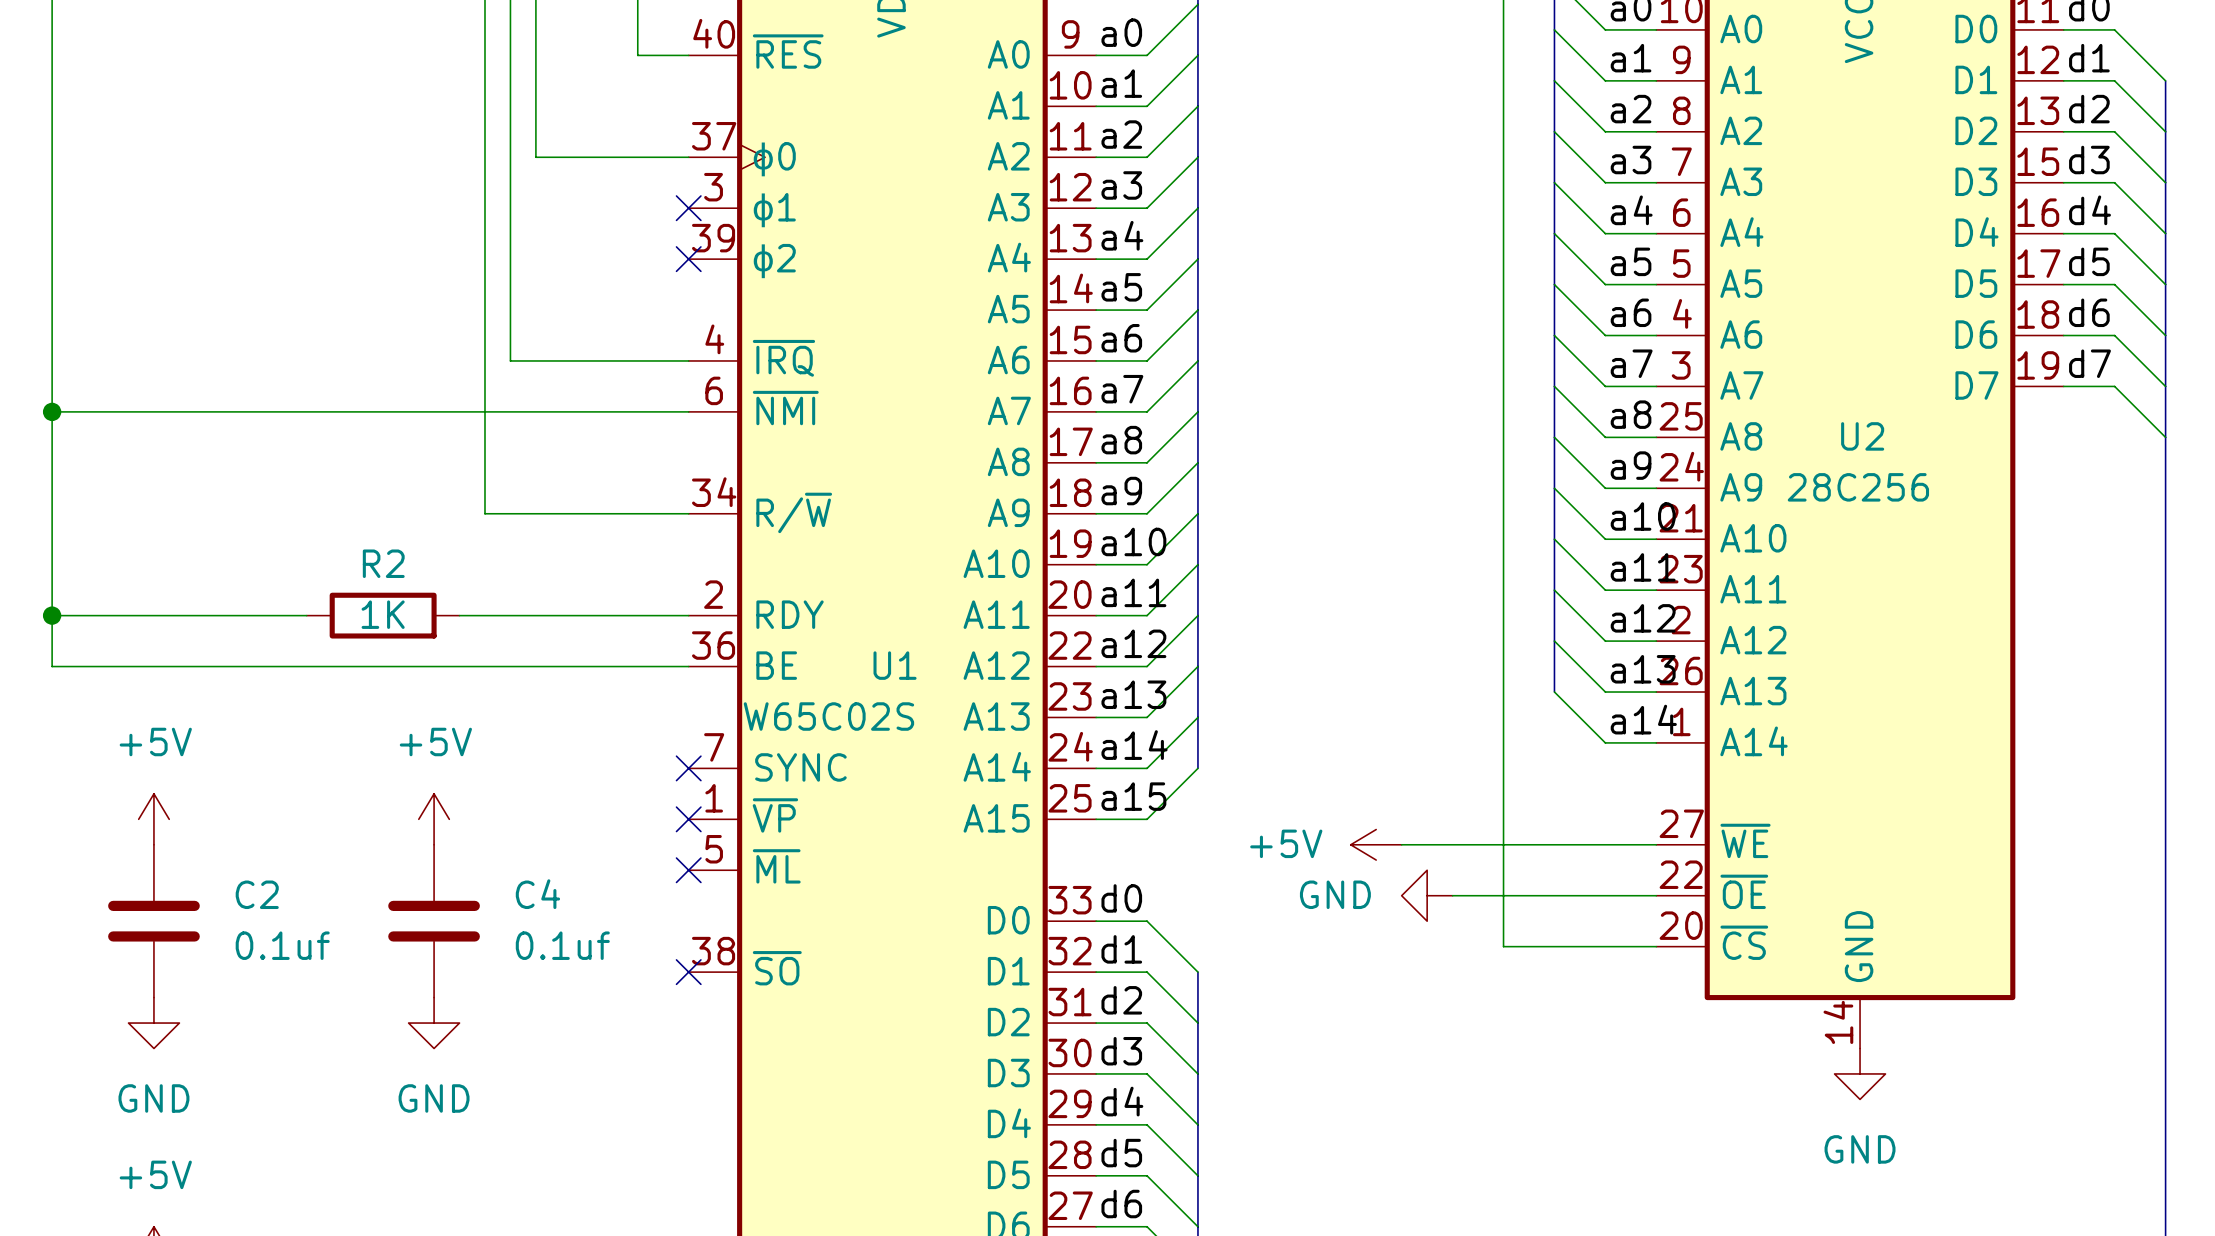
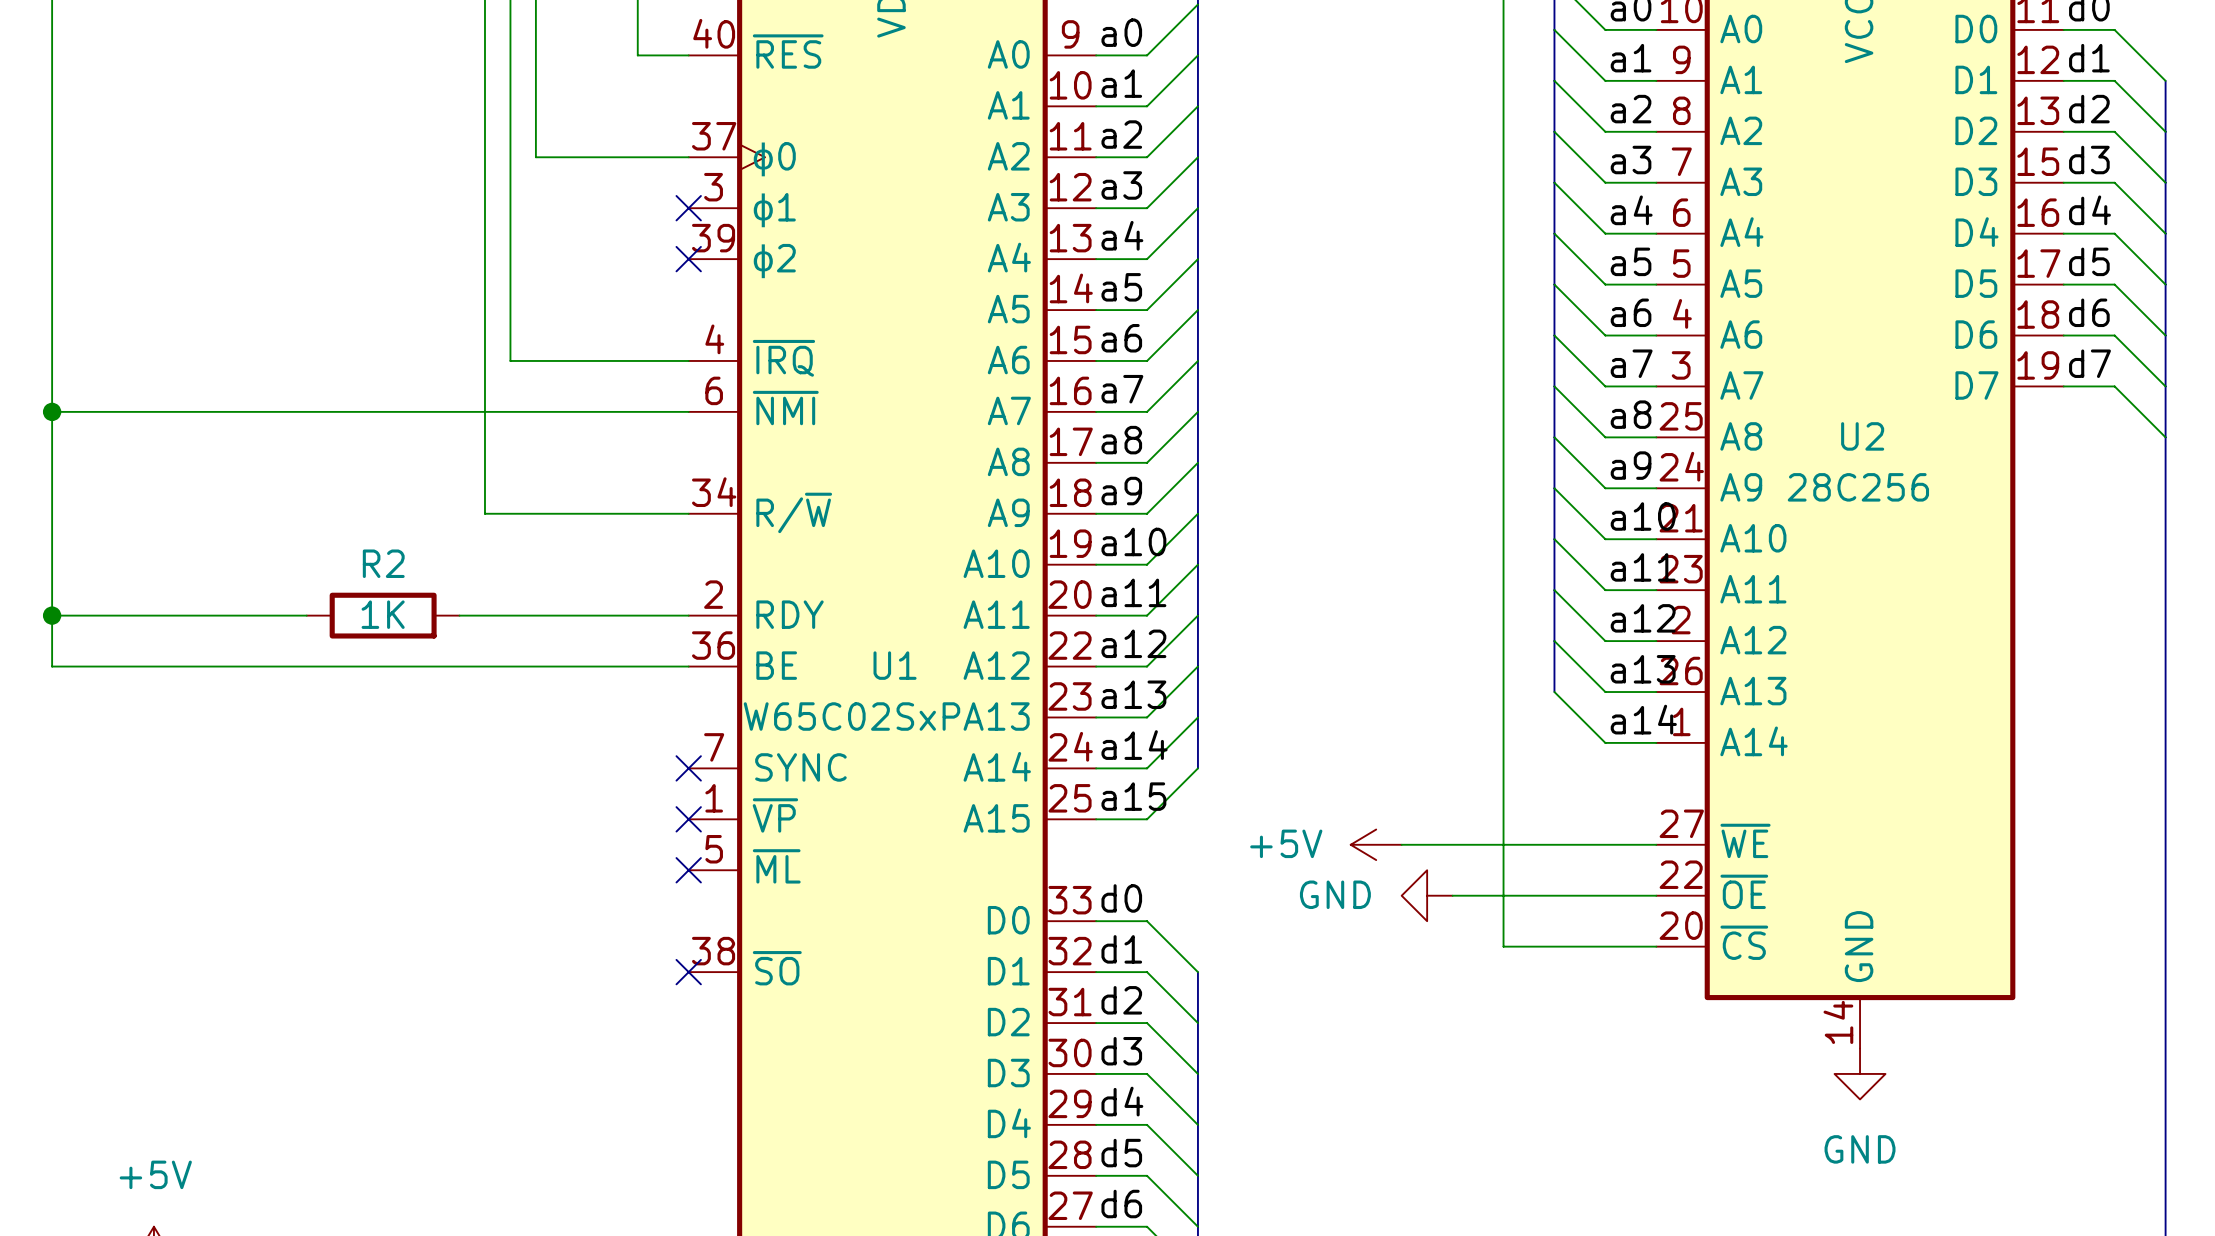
U1 value: W65C02S (828, 716) -> W65C02SxP (851, 716)
power symbol: +5V (153, 819) -> none
power symbol: +5V (434, 819) -> none
C2: 0.1uf (153, 921) -> none
C4: 0.1uf (434, 921) -> none
power symbol: GND (153, 1023) -> none
power symbol: GND (434, 1023) -> none

